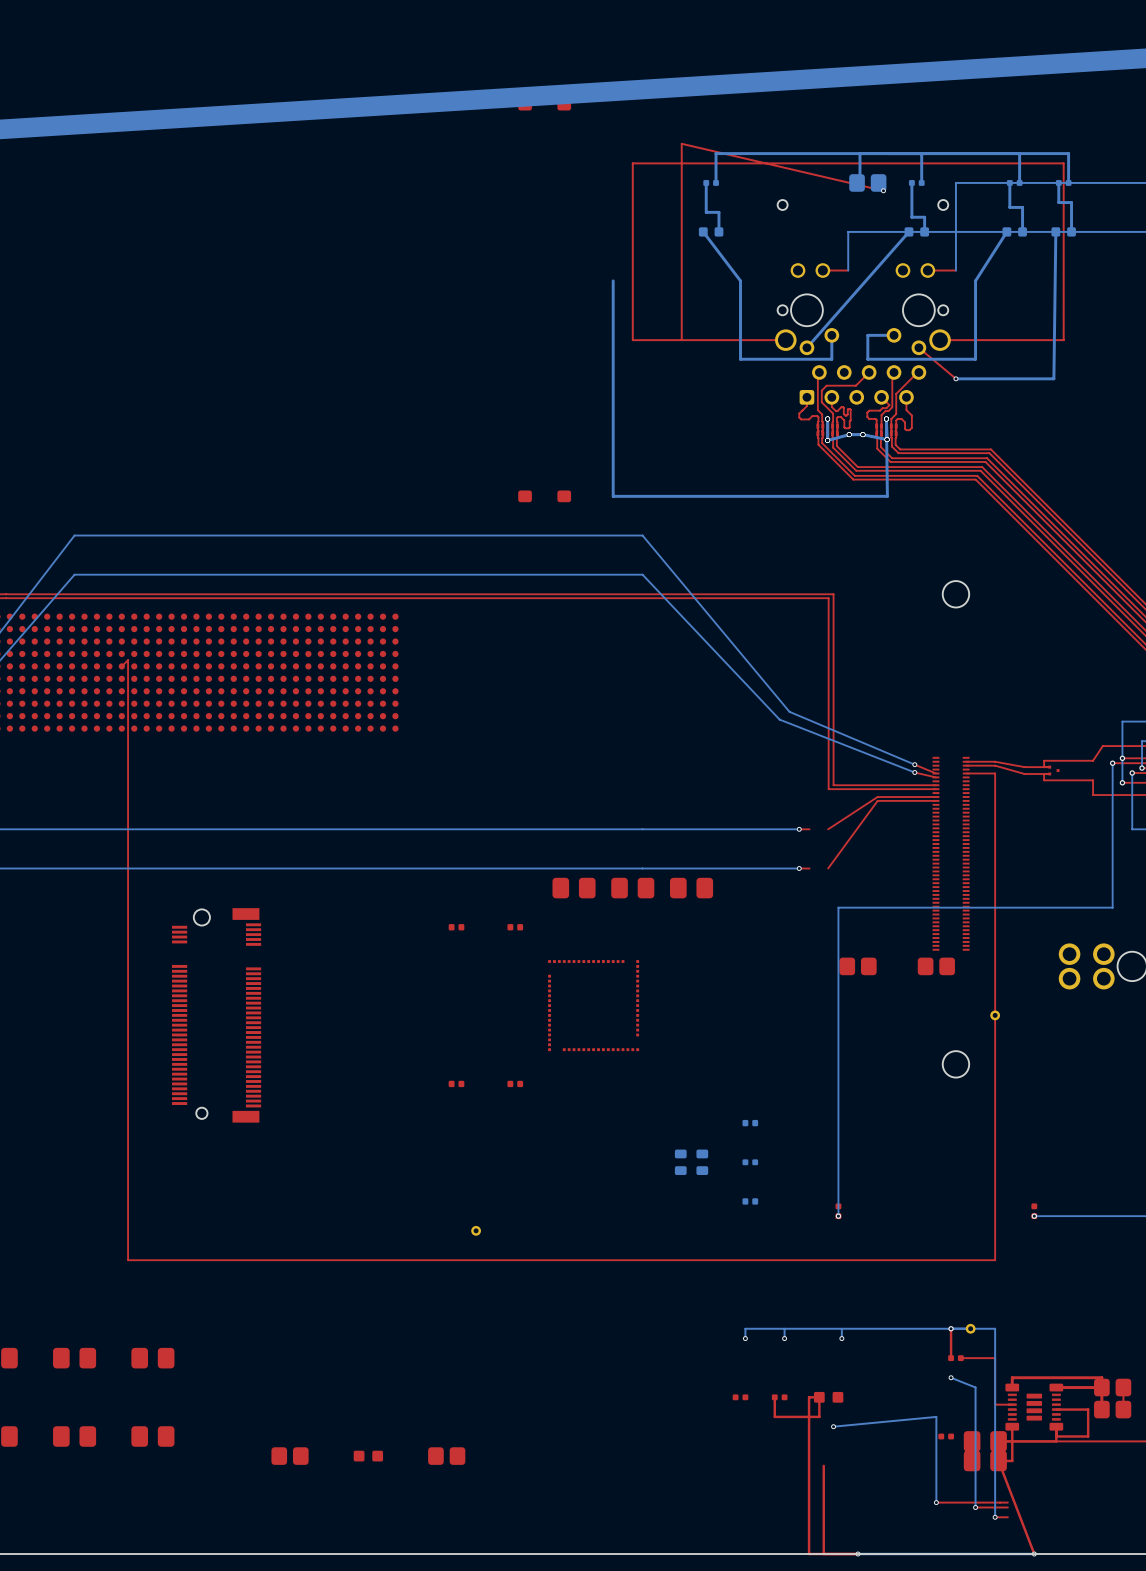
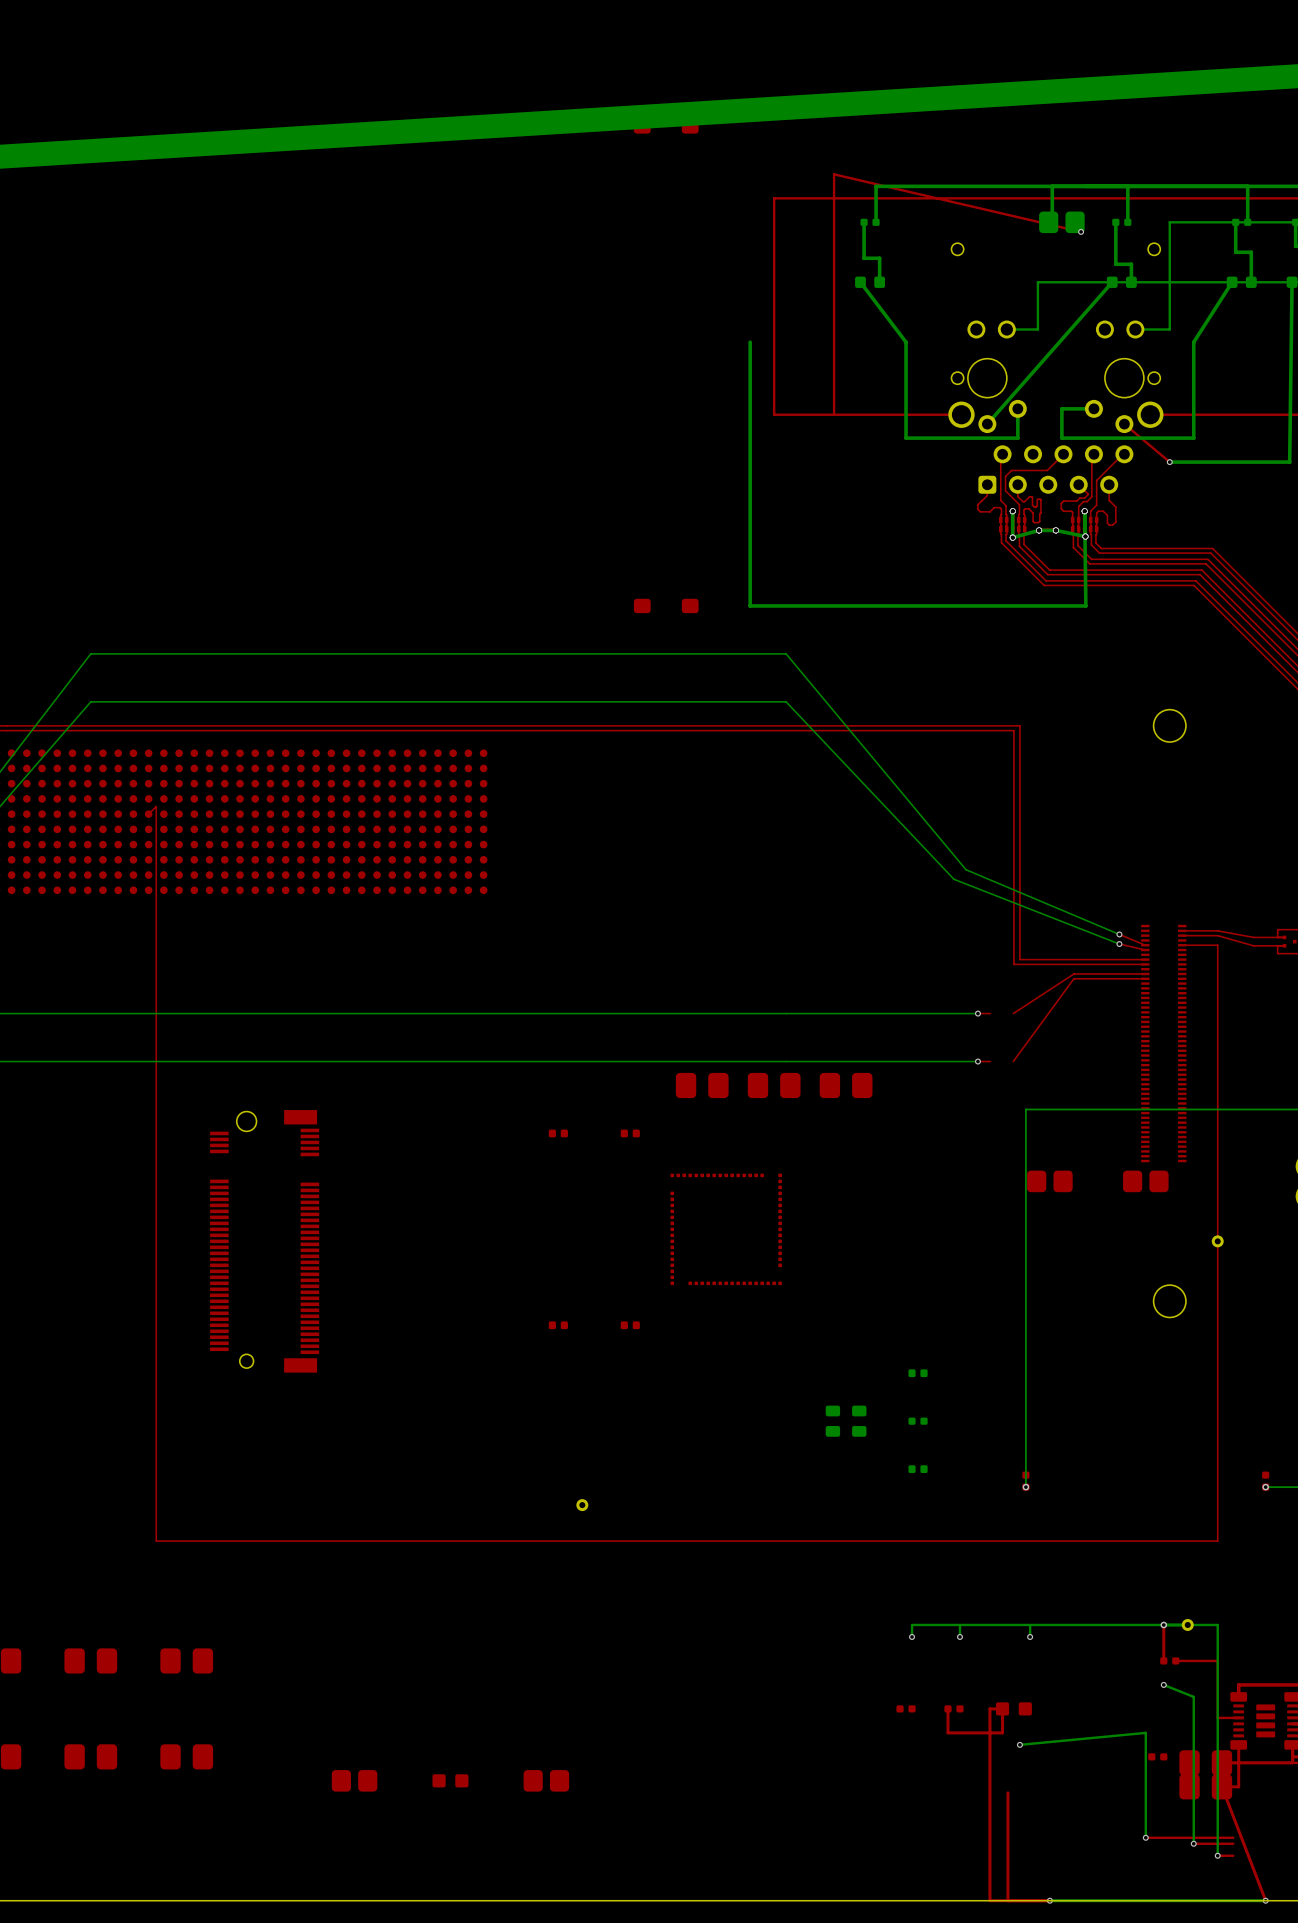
top track: (848, 270) (822, 270) -> none
bottom track: none -> (1037, 329) (1006, 329)
top track: (955, 270) (927, 270) -> none
bottom track: none -> (1169, 329) (1135, 329)

